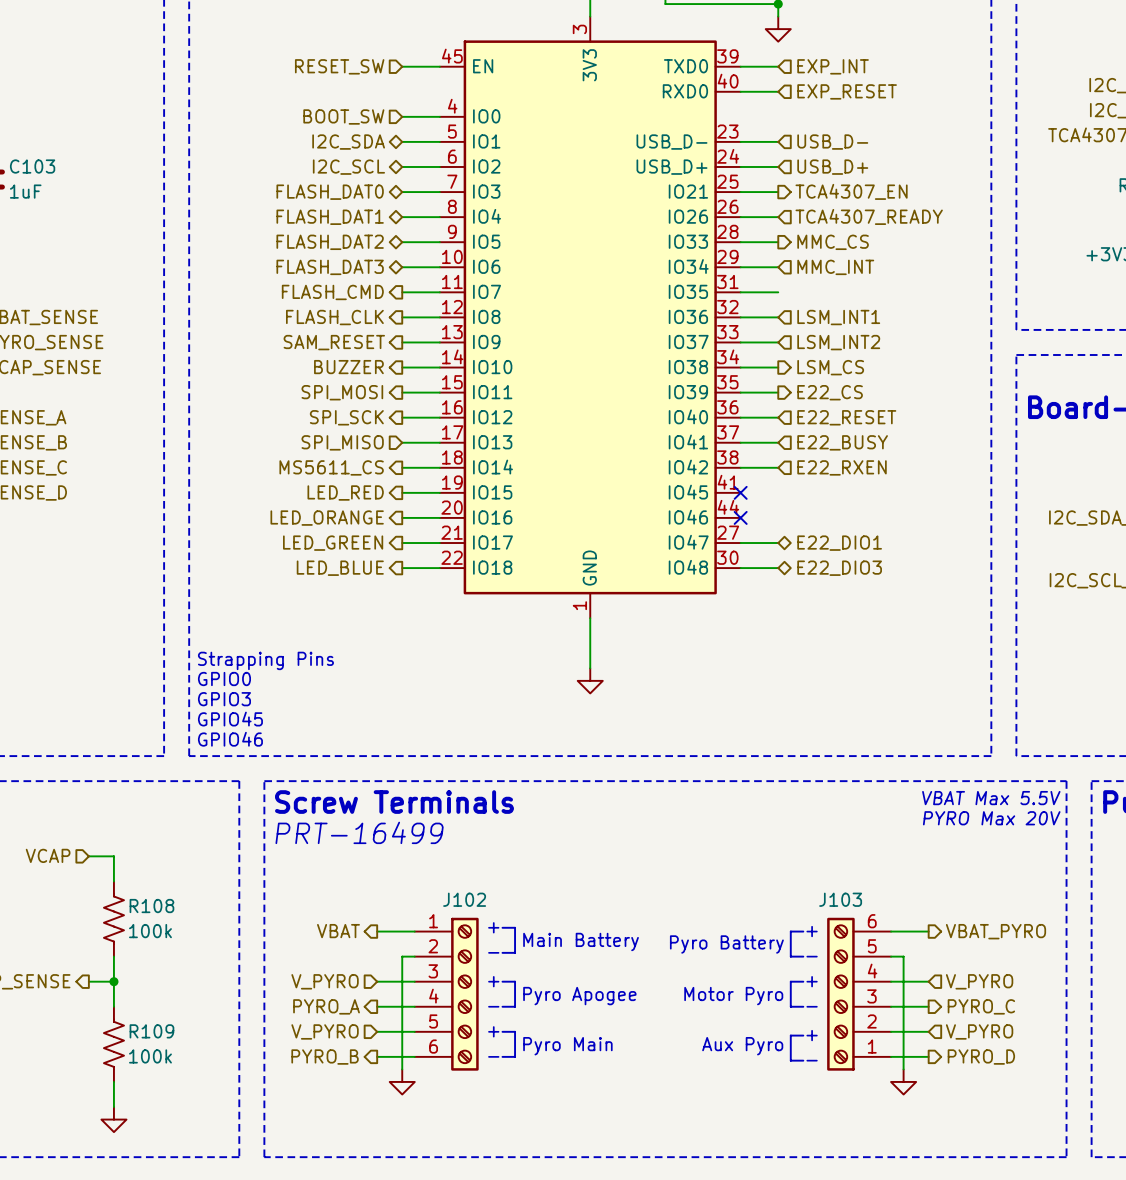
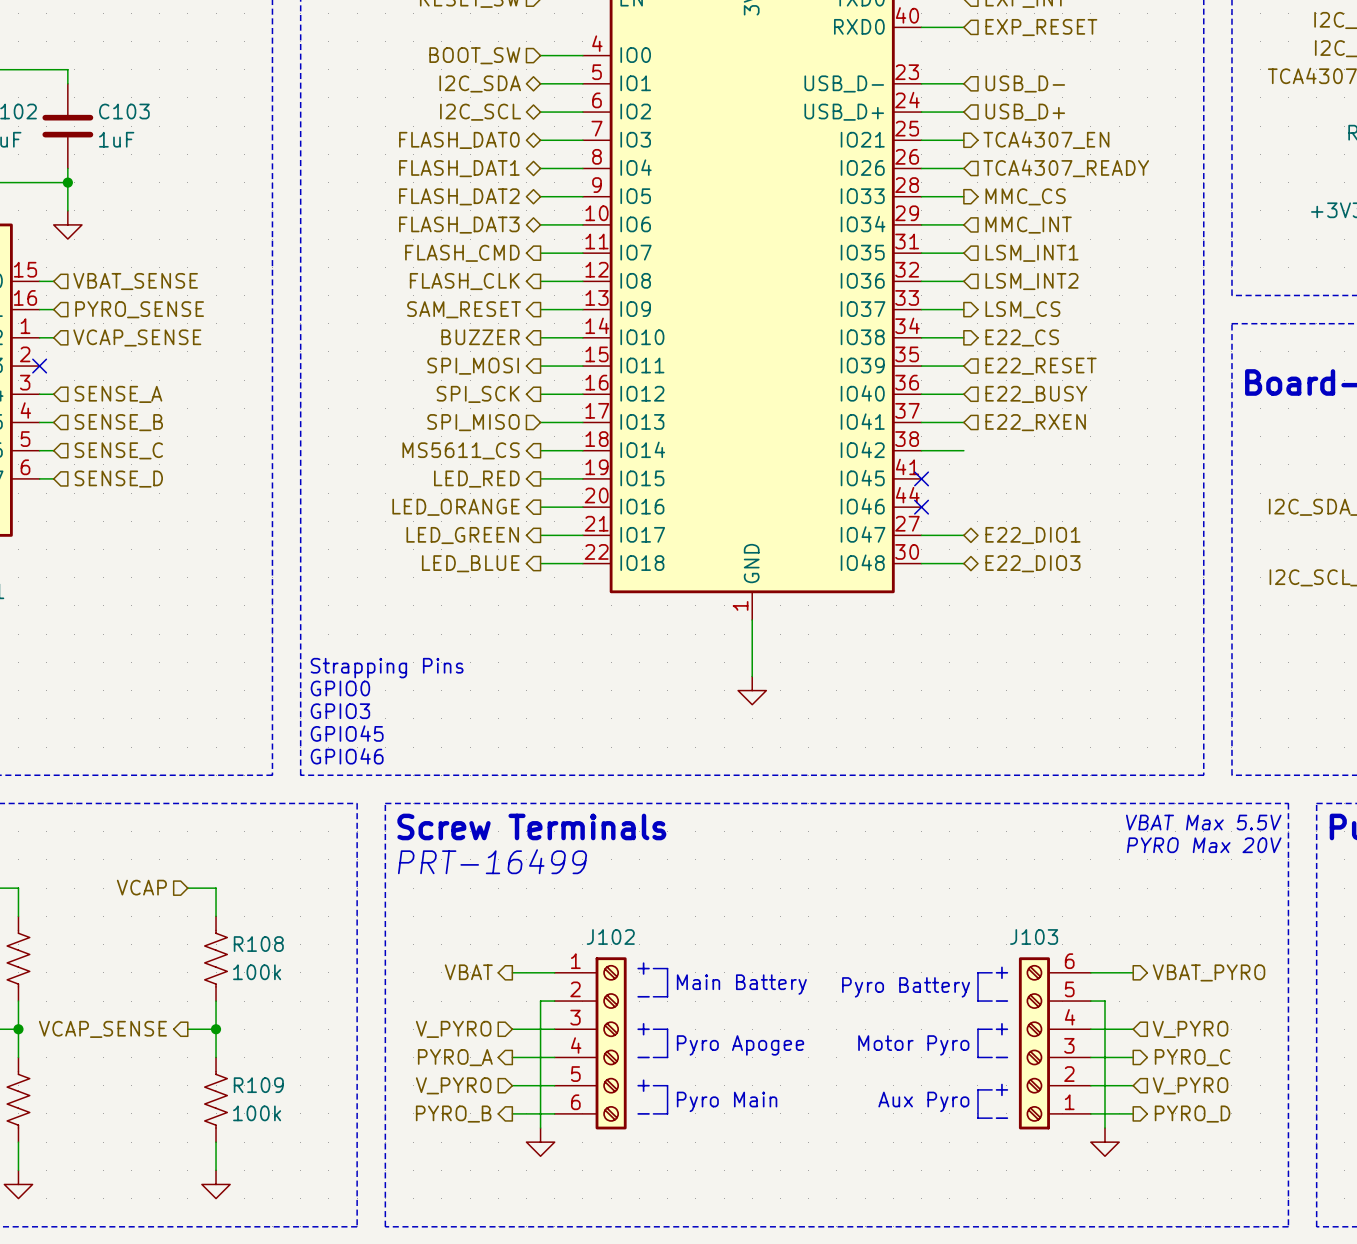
hierarchical label: none -> LSM_INT1 (1031, 253)
hierarchical label: LSM_INT1 (838, 317) -> LSM_INT2 (1031, 281)
hierarchical label shape: input (838, 342) -> output (1022, 309)
hierarchical label: LSM_INT2 (838, 342) -> LSM_CS (1022, 309)
hierarchical label: LSM_CS (830, 367) -> E22_CS (1022, 337)
hierarchical label shape: output (830, 392) -> input (1041, 366)
hierarchical label: E22_CS (830, 392) -> E22_RESET (1041, 366)
hierarchical label: E22_RESET (846, 417) -> E22_BUSY (1036, 394)
hierarchical label: E22_BUSY (842, 442) -> E22_RXEN (1035, 422)
hierarchical label: E22_RXEN (842, 467) -> none

